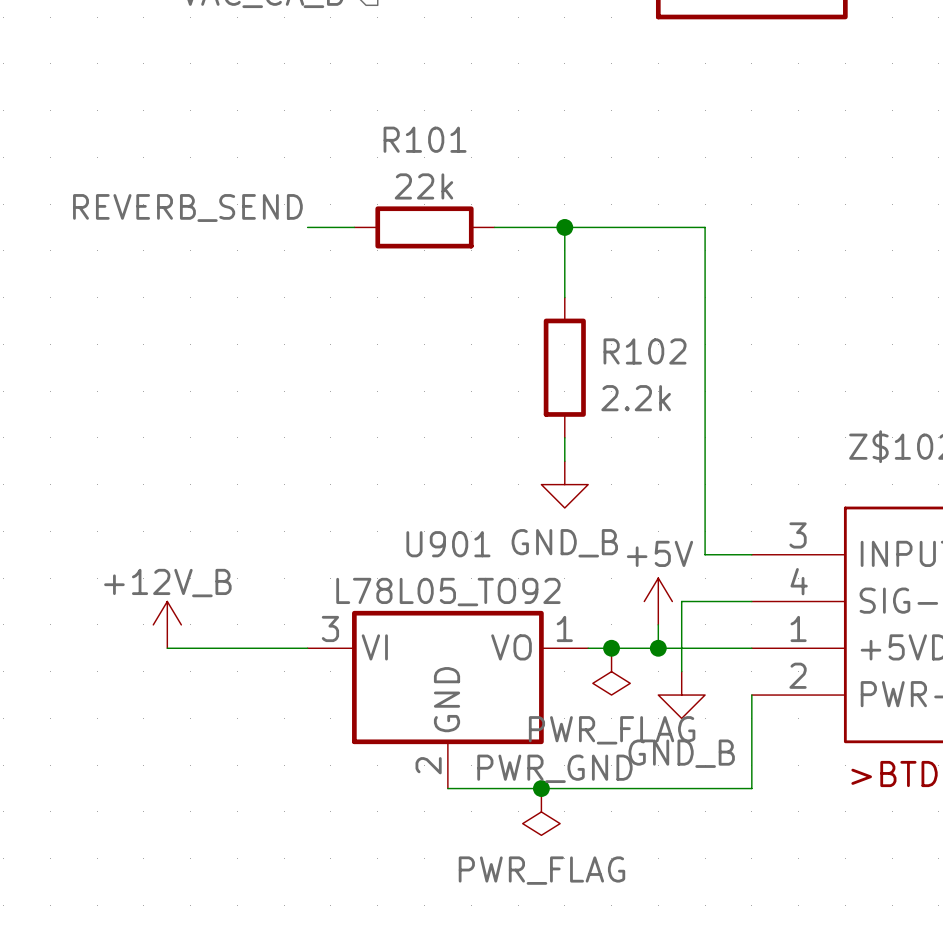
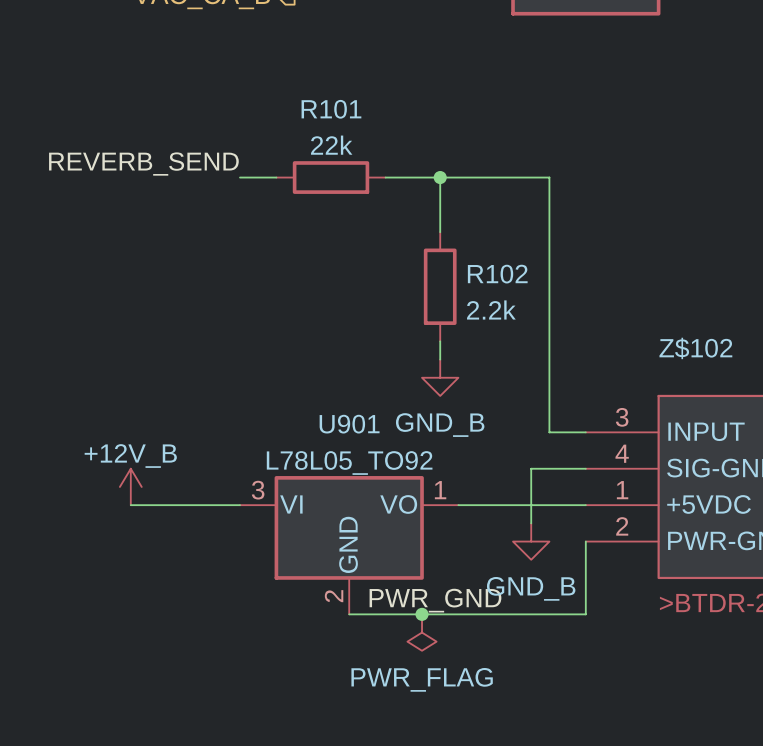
power symbol: +5V (658, 601) -> none
wire: (658, 624) (658, 648) -> none
junction: (611, 648) -> none
junction: (658, 648) -> none
power symbol: PWR_FLAG (611, 671) -> none

